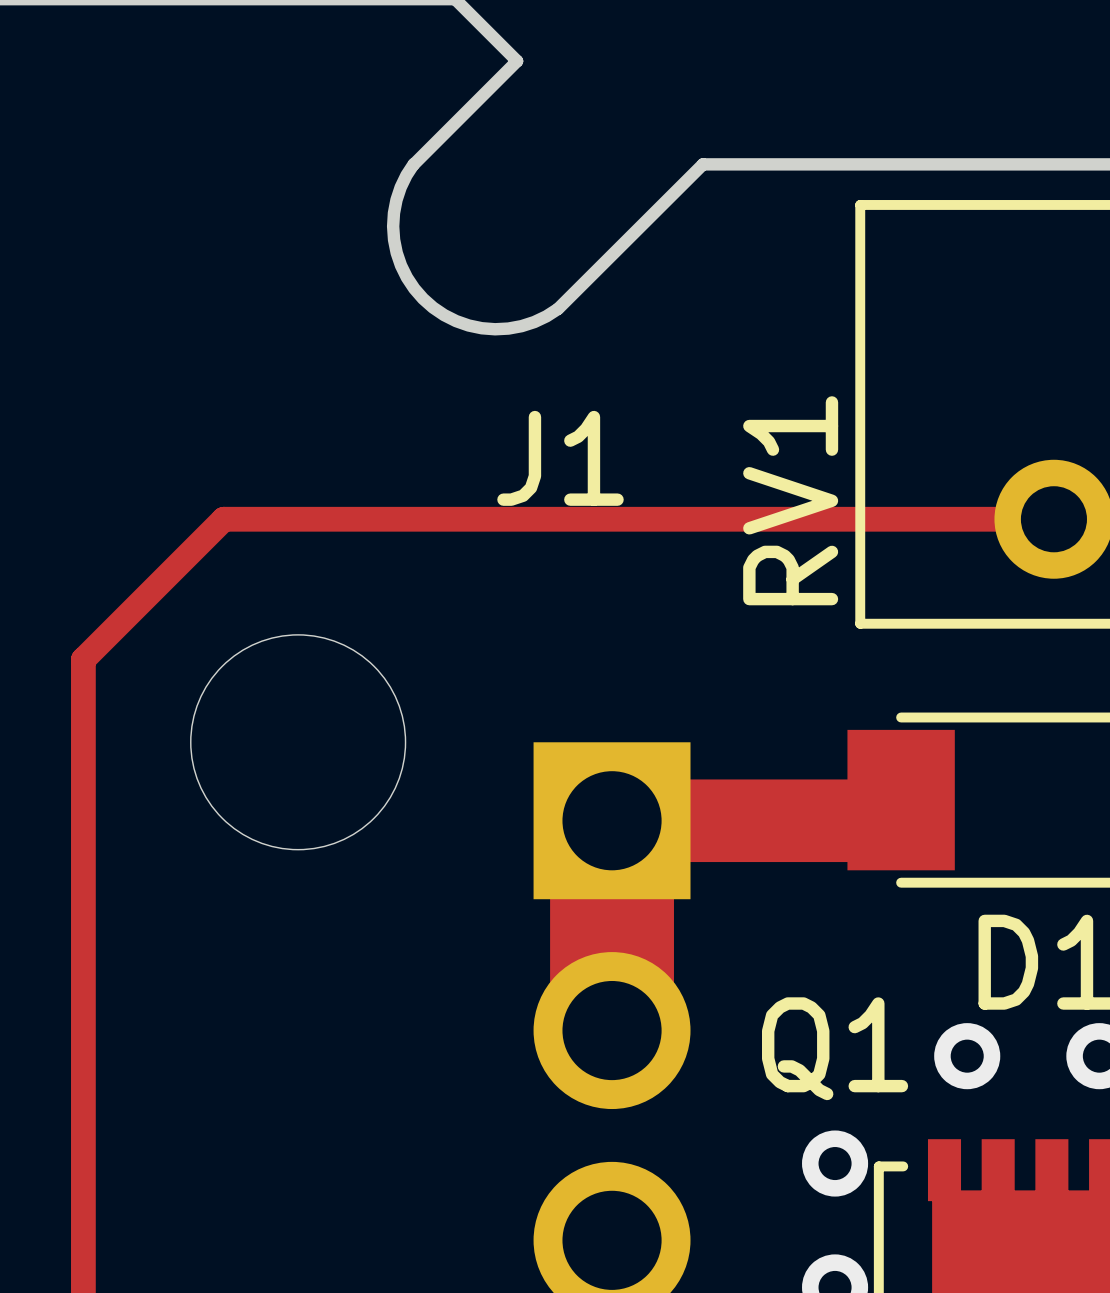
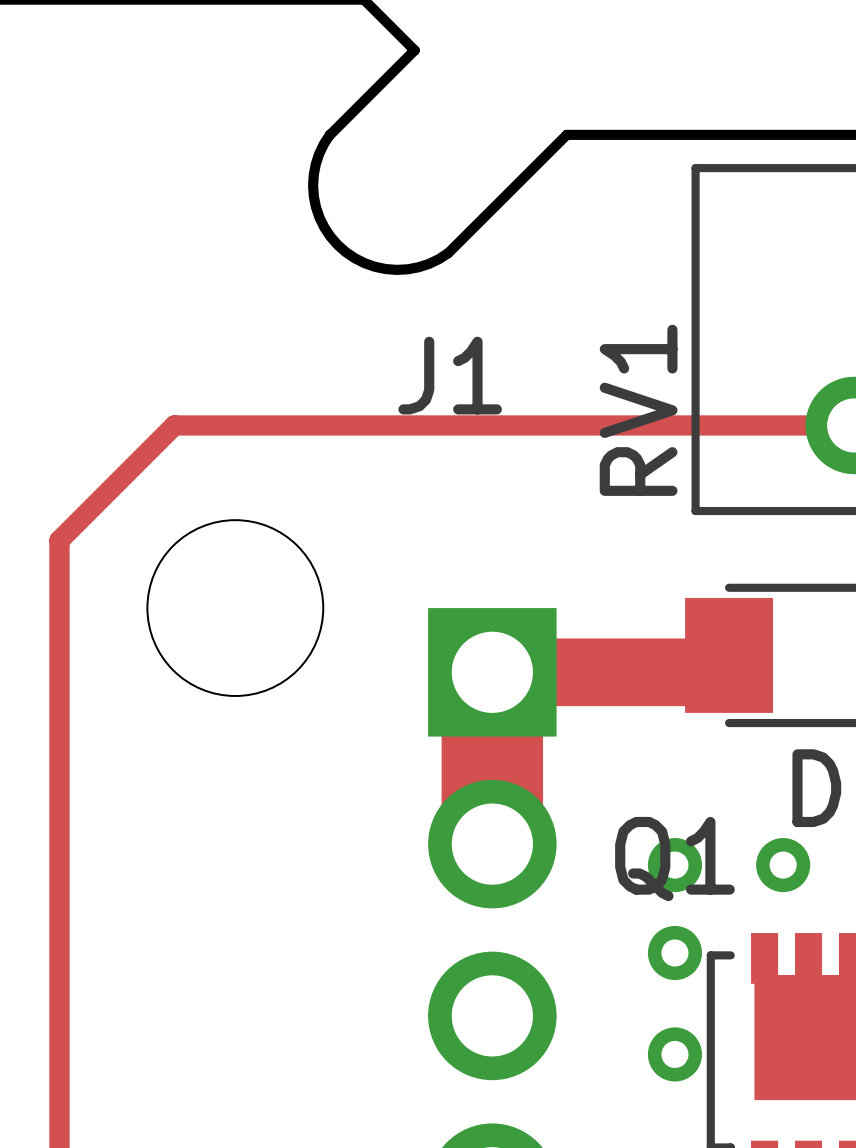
via: none -> (674, 865)

